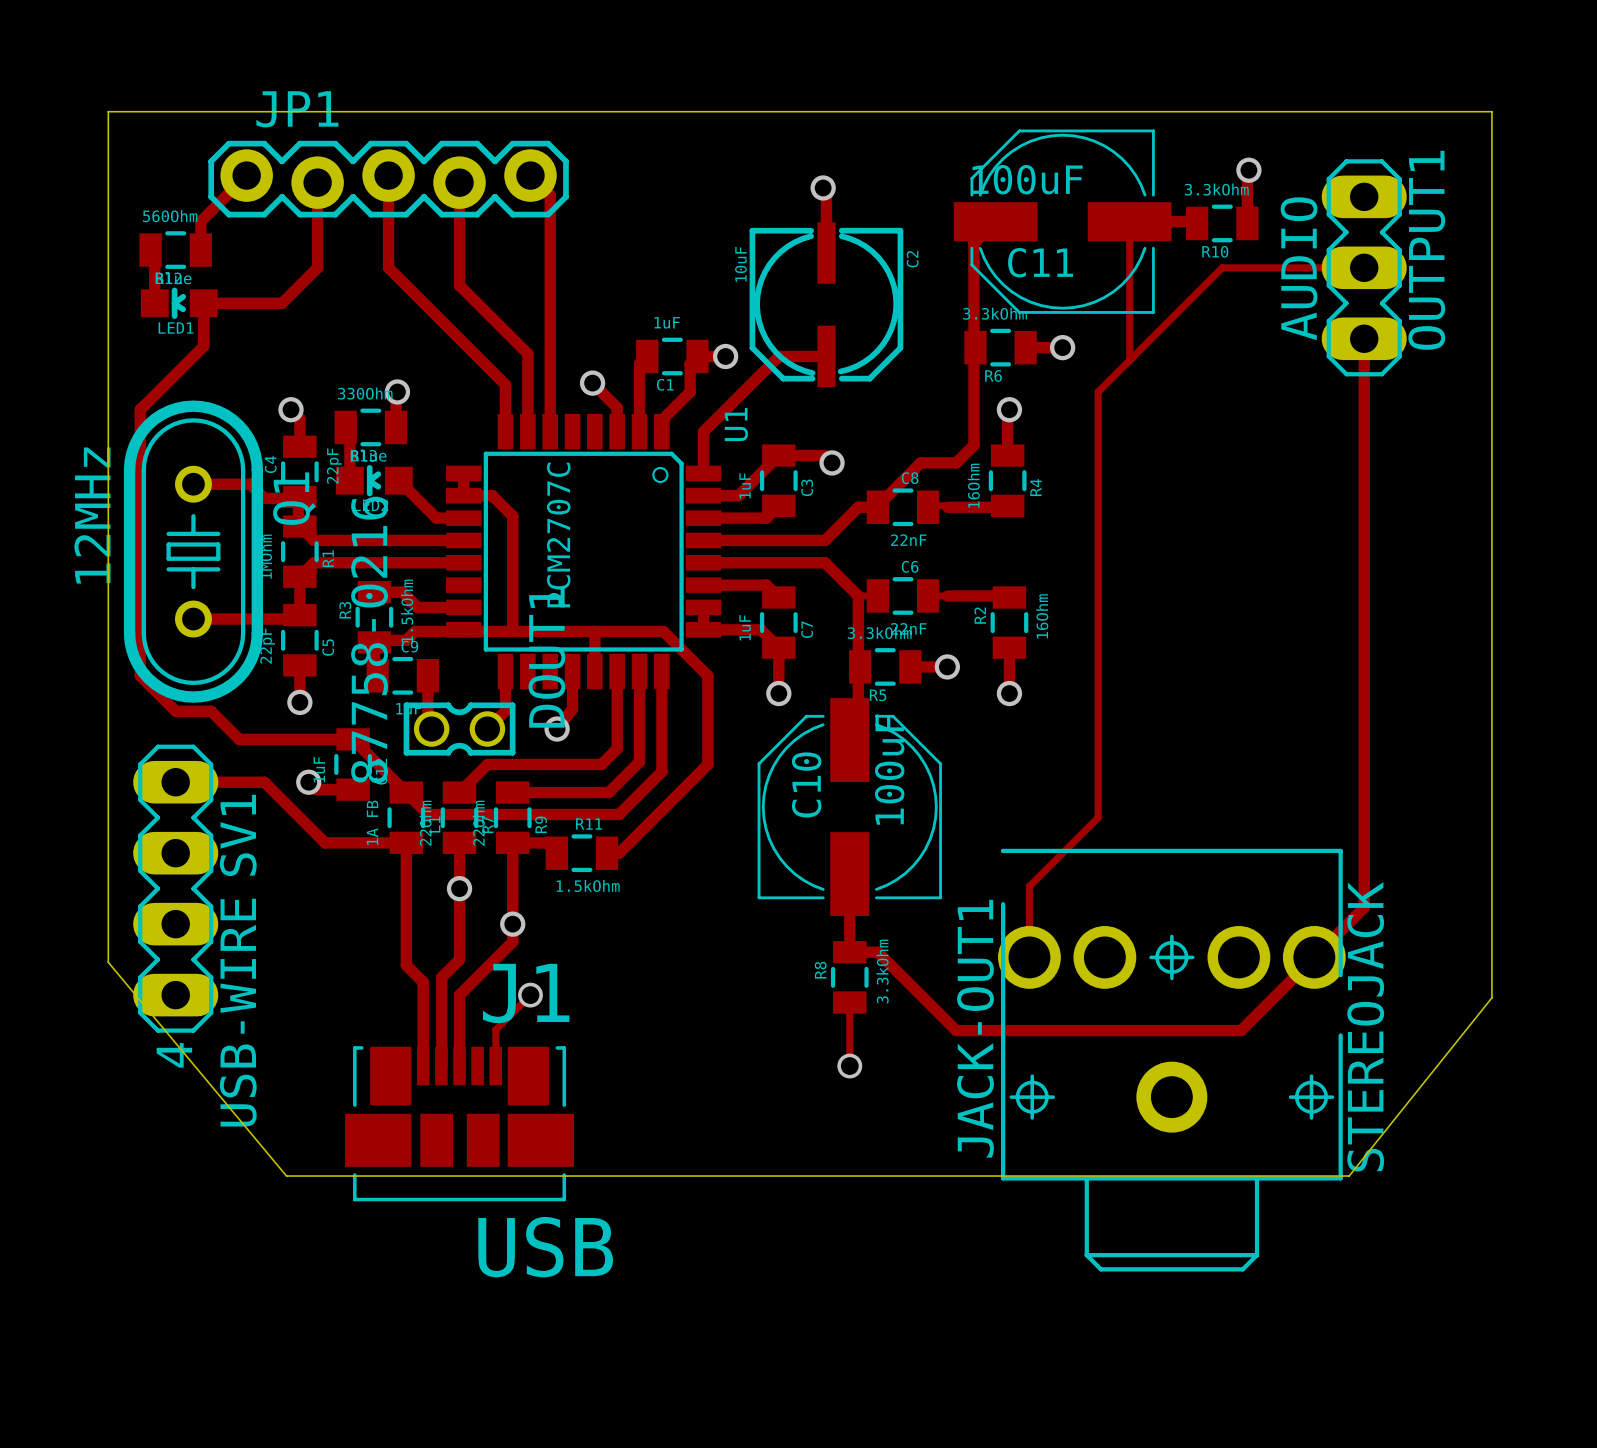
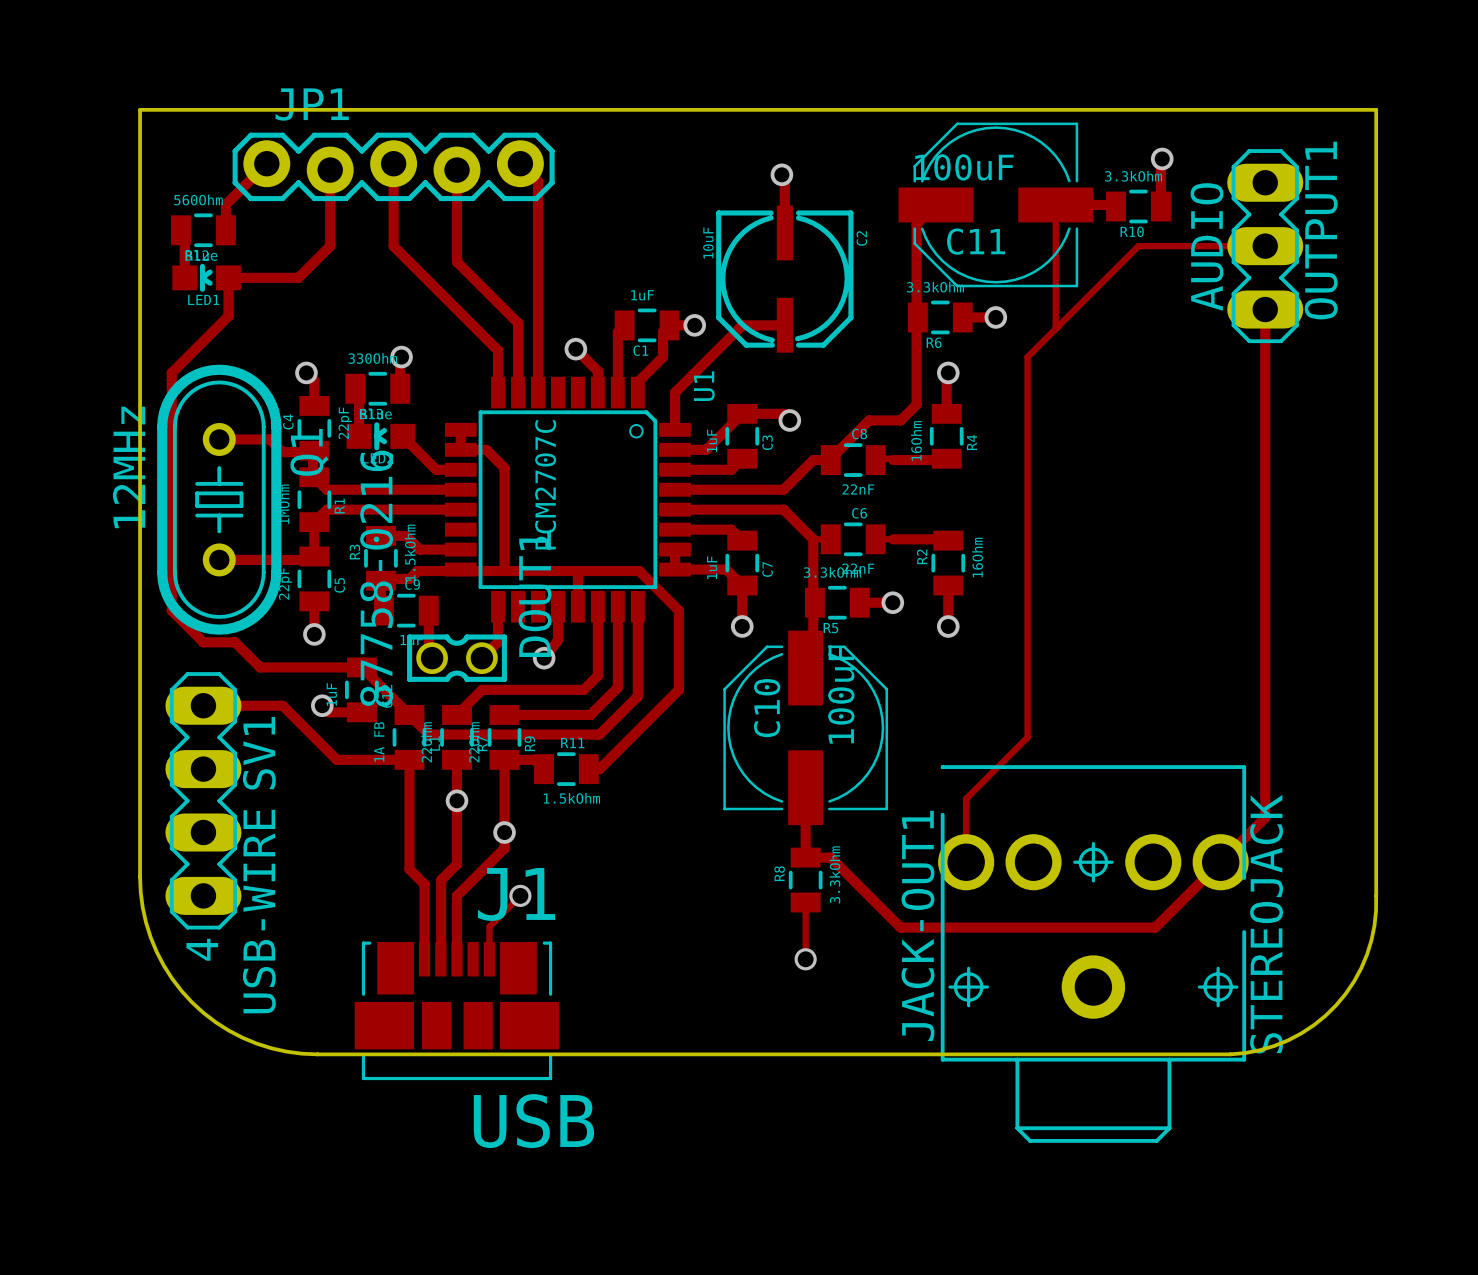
board edge: (108, 111) (108, 962) (286, 1176) (1349, 1176) (1491, 997) (1491, 111) (108, 111) -> (140, 109) (140, 892) (146, 922) (163, 965) (192, 1002) (215, 1022) (242, 1037) (271, 1048) (317, 1054) (1230, 1054) (1274, 1045) (1301, 1033) (1325, 1015) (1345, 993) (1367, 954) (1376, 910) (1376, 109) (140, 109)

